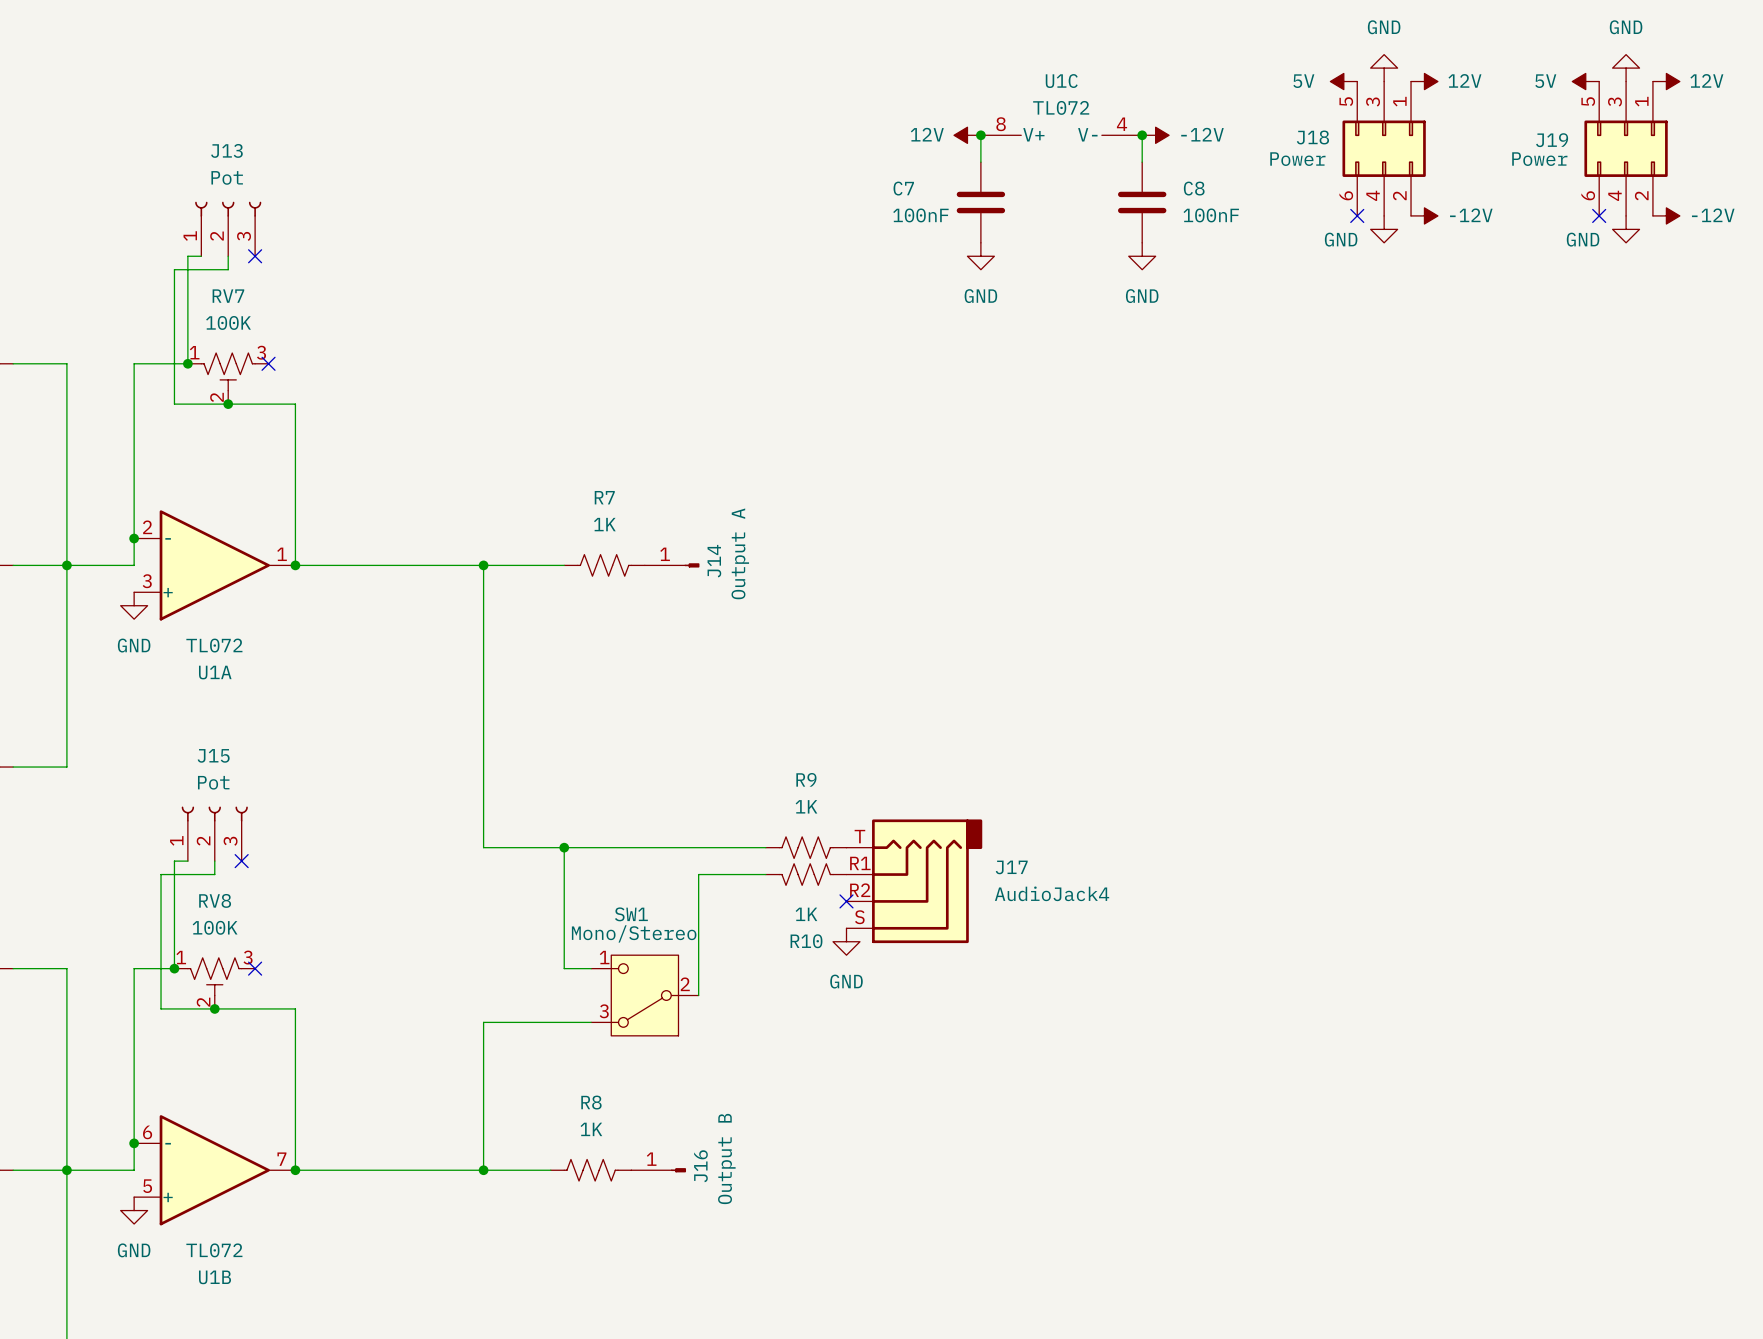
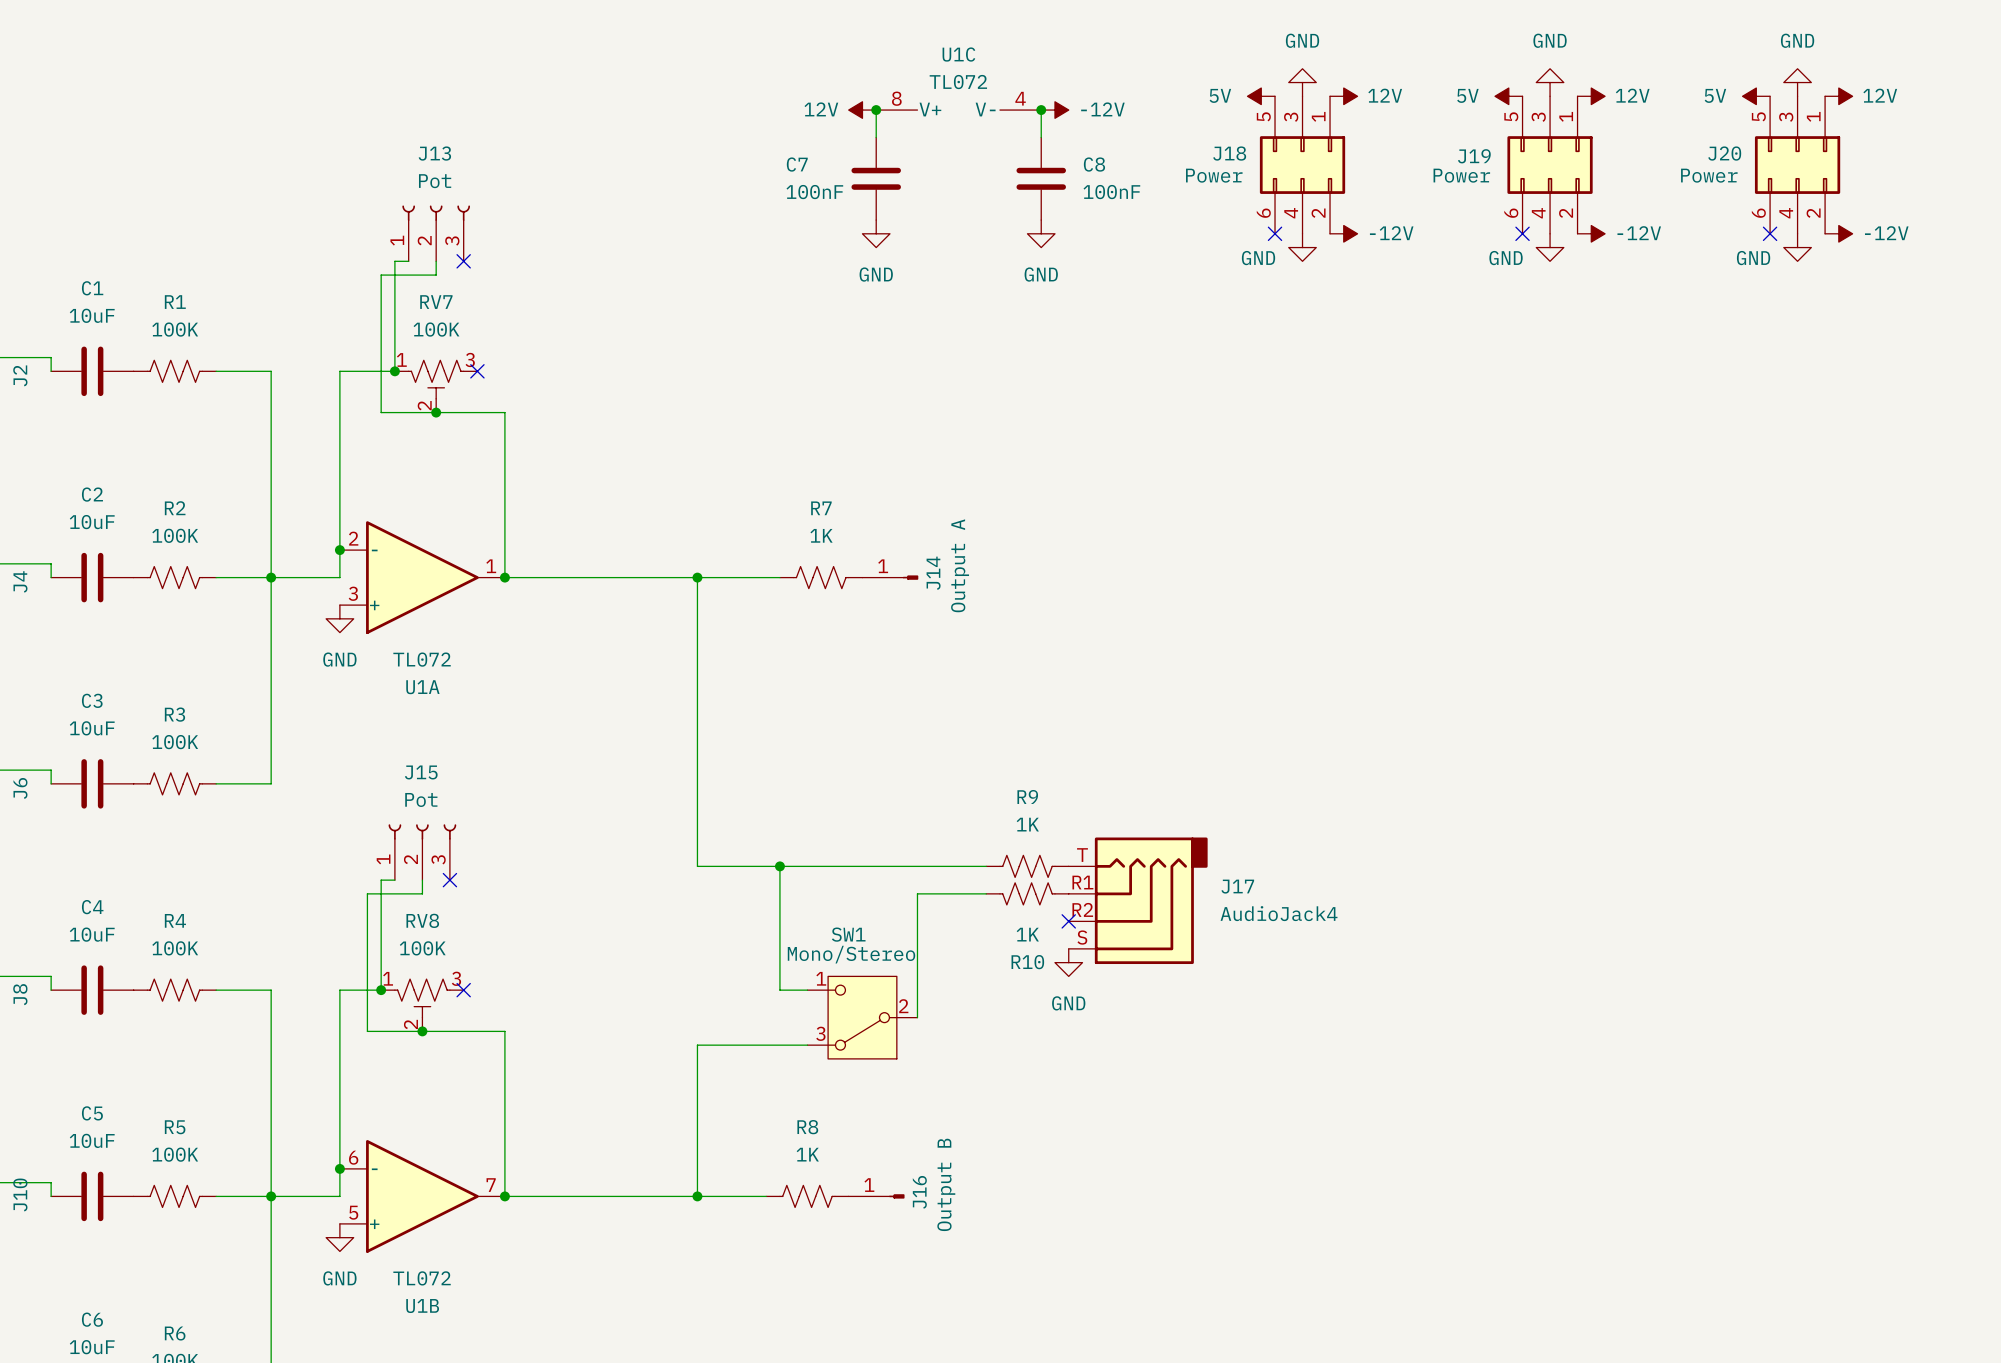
power symbol position: GND (1384, 68) -> GND (1550, 82)
power symbol position: GND (1626, 68) -> GND (1797, 82)
power symbol: none -> GND (1302, 82)
power symbol position: 5V (1343, 81) -> 5V (1508, 96)
power symbol position: 12V (1424, 81) -> 12V (1591, 96)
power symbol position: 5V (1585, 81) -> 5V (1756, 96)
power symbol position: 12V (1666, 81) -> 12V (1838, 96)
power symbol: none -> 5V (1261, 96)
power symbol: none -> 12V (862, 110)
wire: none -> (876, 110) (876, 137)
junction: none -> (876, 110)
junction: none -> (1041, 110)
power symbol: none -> -12V (1054, 110)
power symbol rotation: 0° (967, 135) -> 180° (1343, 96)
power symbol position: 12V (967, 135) -> 12V (1343, 96)
wire: (980, 135) (980, 162) -> (1041, 110) (1041, 137)
junction: (980, 135) -> none
U1C position: (1061, 135) -> (958, 110)
wire: (1142, 135) (1142, 162) -> none
junction: (1142, 135) -> none
power symbol position: -12V (1155, 135) -> -12V (1343, 233)
J18 position: (1384, 148) -> (1302, 165)
J19 position: (1626, 148) -> (1550, 165)
J20: none -> Power (1797, 165)
C7 position: (980, 202) -> (876, 178)
C8 position: (1142, 202) -> (1041, 178)
no-connect mark: (1357, 215) -> none
power symbol position: -12V (1424, 215) -> -12V (1591, 233)
no-connect mark: (1599, 215) -> none
power symbol position: -12V (1666, 215) -> -12V (1838, 233)
power symbol: none -> GND (876, 233)
power symbol: none -> GND (1041, 233)
no-connect mark: none -> (1275, 233)
no-connect mark: none -> (1522, 233)
power symbol position: GND (1384, 229) -> GND (1550, 247)
no-connect mark: none -> (1770, 233)
power symbol position: GND (1626, 229) -> GND (1797, 247)
power symbol: none -> GND (1302, 247)
power symbol: GND (980, 256) -> none
power symbol: GND (1142, 256) -> none

